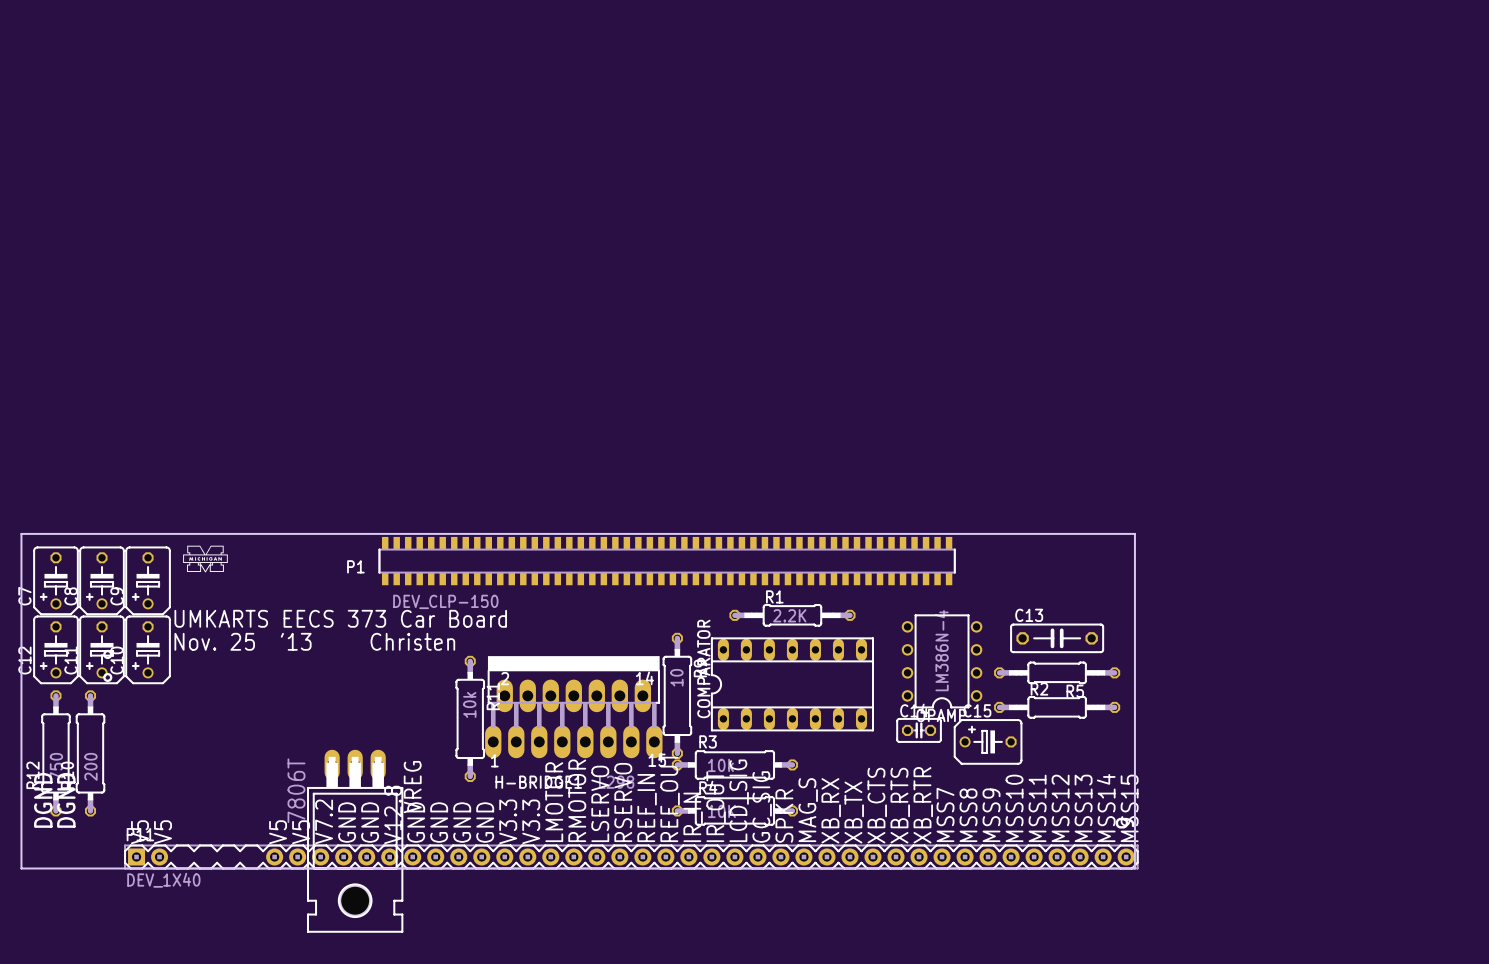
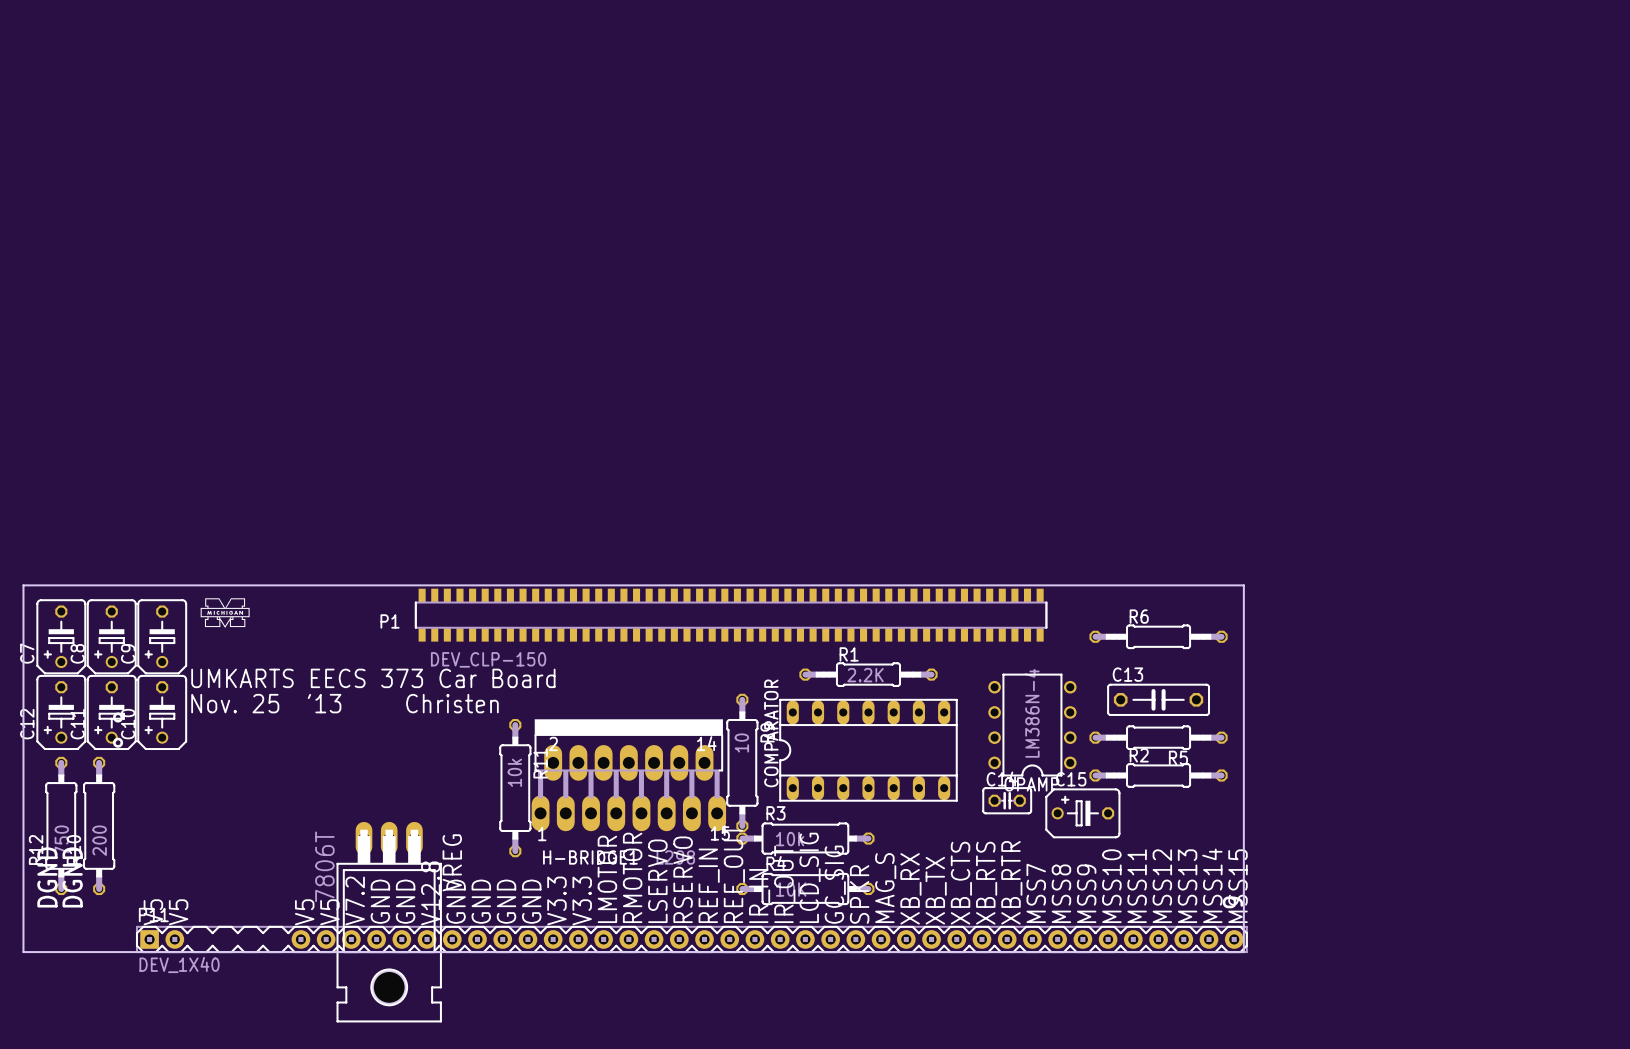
R6: none -> (1158, 636)

